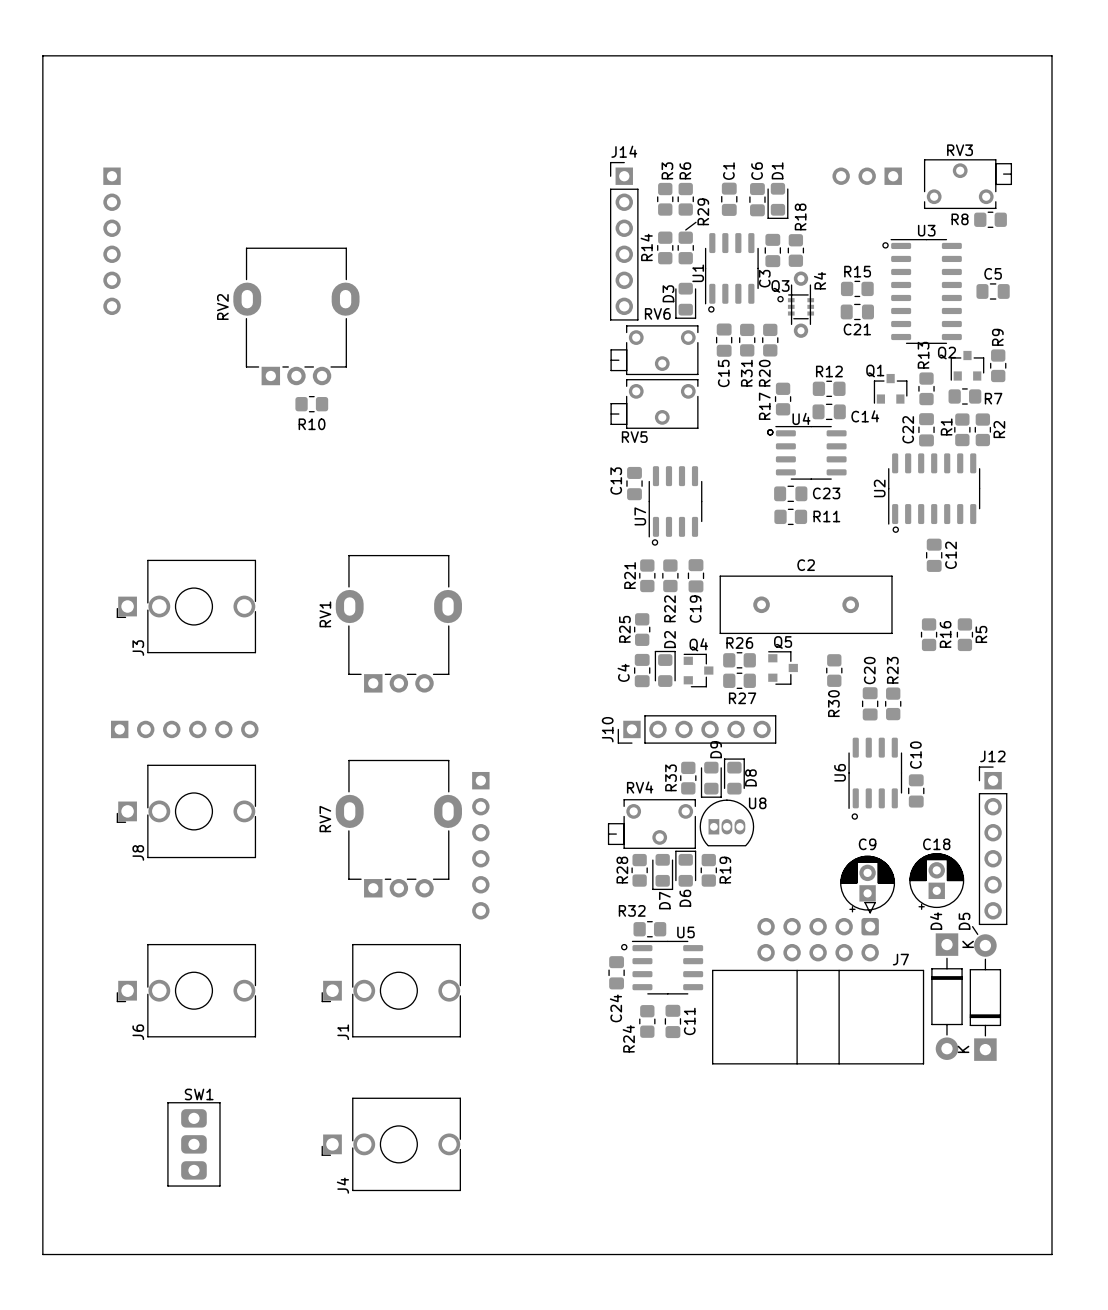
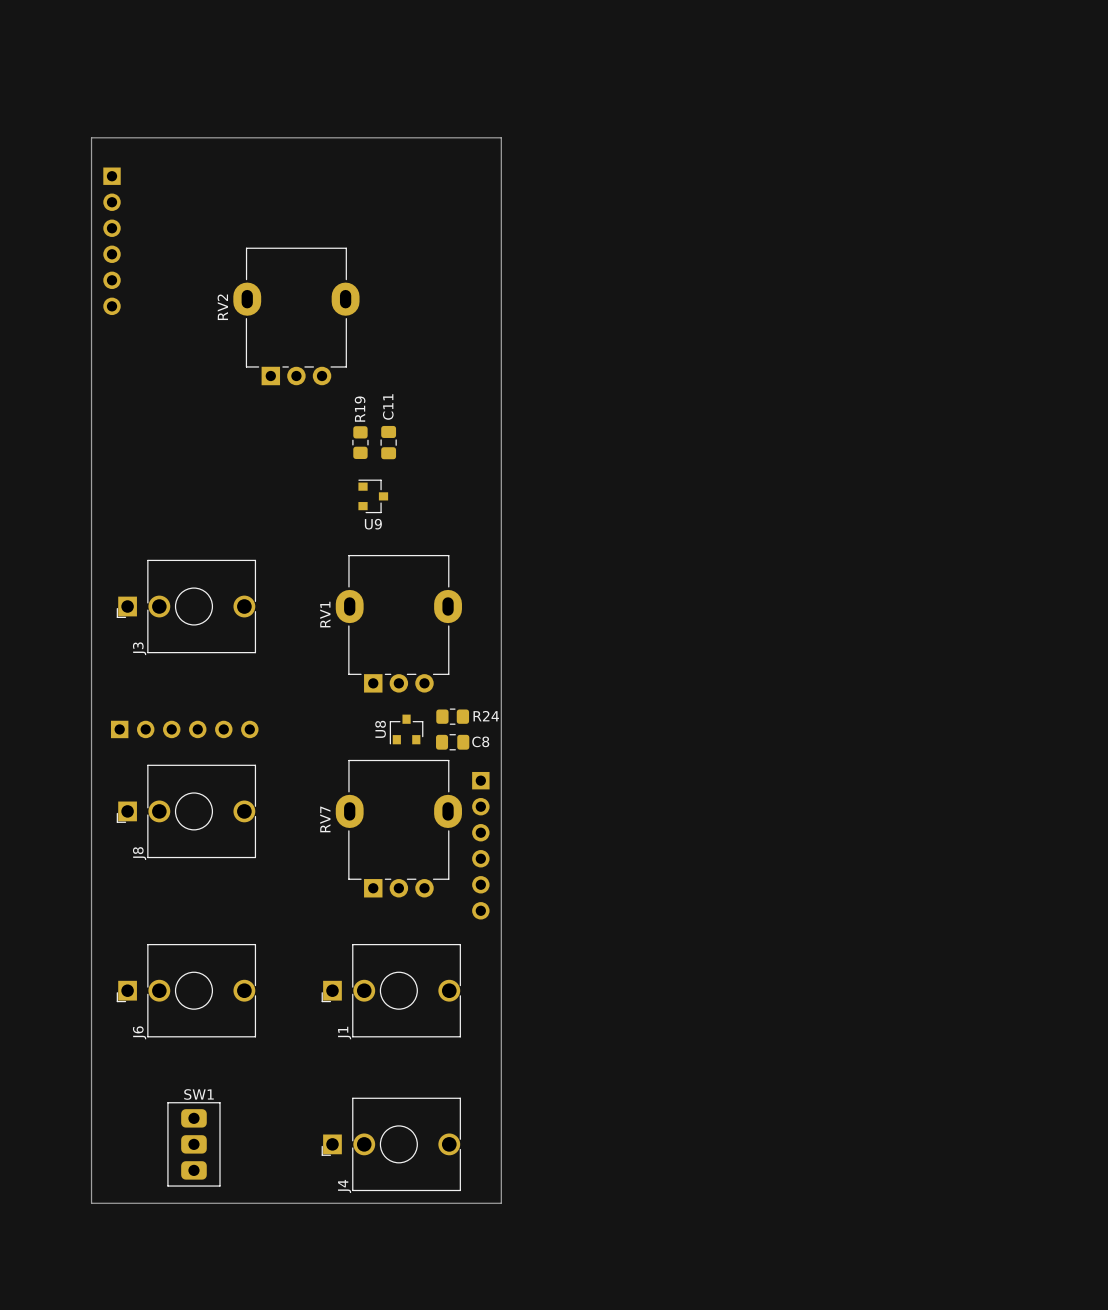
board edge: (42, 55) (1052, 55) (1052, 1254) (42, 1254) (42, 55) -> none
board edge: none -> (91, 137) (91, 1203) (501, 1203) (501, 137) (91, 137)
part: (867, 176) -> none
RV3: (967, 184) -> none
R3: (665, 199) -> none
R6: (685, 199) -> none
C1: (729, 199) -> none
C6: (757, 199) -> none
D1: (777, 200) -> none
R8: (990, 219) -> none
line: (695, 222) (685, 230) -> none
J14: (624, 241) -> none
drawing: [882, 242, 889, 249] -> none
R14: (665, 247) -> none
R29: (685, 247) -> none
C3: (772, 250) -> none
R18: (795, 250) -> none
U1: (731, 268) -> none
R15: (857, 288) -> none
U3: (926, 291) -> none
C5: (993, 291) -> none
drawing: [777, 295, 784, 303] -> none
D3: (685, 300) -> none
R4: (800, 304) -> none
drawing: [708, 306, 715, 313] -> none
Q3: (800, 306) -> none
C21: (857, 311) -> none
C15: (724, 340) -> none
R31: (747, 340) -> none
R20: (770, 340) -> none
RV6: (654, 350) -> none
Q2: (967, 365) -> none
R9: (998, 365) -> none
R12: (829, 388) -> none
Q1: (890, 388) -> none
R13: (926, 388) -> none
R7: (964, 396) -> none
R17: (783, 399) -> none
RV5: (654, 403) -> none
R10: (311, 404) -> none
C14: (829, 411) -> none
drawing: [767, 429, 774, 436] -> none
C22: (926, 429) -> none
R1: (962, 429) -> none
R2: (982, 429) -> none
U4: (810, 452) -> none
C13: (634, 483) -> none
U2: (934, 489) -> none
C23: (790, 493) -> none
U9: none -> (373, 496)
U7: (675, 501) -> none
R11: (790, 516) -> none
drawing: [892, 526, 899, 533] -> none
drawing: [651, 539, 659, 546] -> none
C12: (934, 555) -> none
R21: (647, 575) -> none
R22: (670, 575) -> none
C19: (695, 575) -> none
C2: (806, 604) -> none
R25: (642, 629) -> none
R16: (929, 634) -> none
R5: (964, 634) -> none
R26: (739, 660) -> none
Q5: (783, 667) -> none
D2: (665, 668) -> none
C4: (642, 670) -> none
Q4: (698, 670) -> none
R30: (834, 670) -> none
R27: (739, 680) -> none
C20: (870, 703) -> none
R23: (893, 703) -> none
J10: (697, 729) -> none
C8: none -> (452, 742)
U6: (875, 773) -> none
D8: (734, 776) -> none
R33: (688, 778) -> none
D9: (711, 779) -> none
C10: (916, 790) -> none
U8 footprint: [699, 799, 755, 847] -> [389, 714, 424, 745]
U8 name position: U8 (757, 803) -> U8 (380, 729)
drawing: [851, 813, 858, 820] -> none
RV4: (651, 824) -> none
J12: (993, 845) -> none
D6: (685, 868) -> none
R28: (639, 870) -> none
R19 position: (708, 870) -> (360, 442)
R19 name position: R19 (725, 870) -> R19 (360, 409)
D7: (662, 871) -> none
C18: (936, 881) -> none
C9: (867, 884) -> none
line: (972, 926) (977, 934) -> none
R32: (649, 929) -> none
drawing: [621, 943, 628, 951] -> none
U5: (667, 967) -> none
C24: (616, 972) -> none
J7: (818, 983) -> none
D4: (946, 996) -> none
D5: (985, 997) -> none
R24 rotation: 0° (647, 1021) -> 90° clockwise (452, 716)
R24 position: (647, 1021) -> (452, 716)
C11 position: (672, 1021) -> (388, 442)
C11 name position: C11 (689, 1021) -> C11 (388, 406)
R24 name position: R24 (628, 1038) -> R24 (486, 716)

